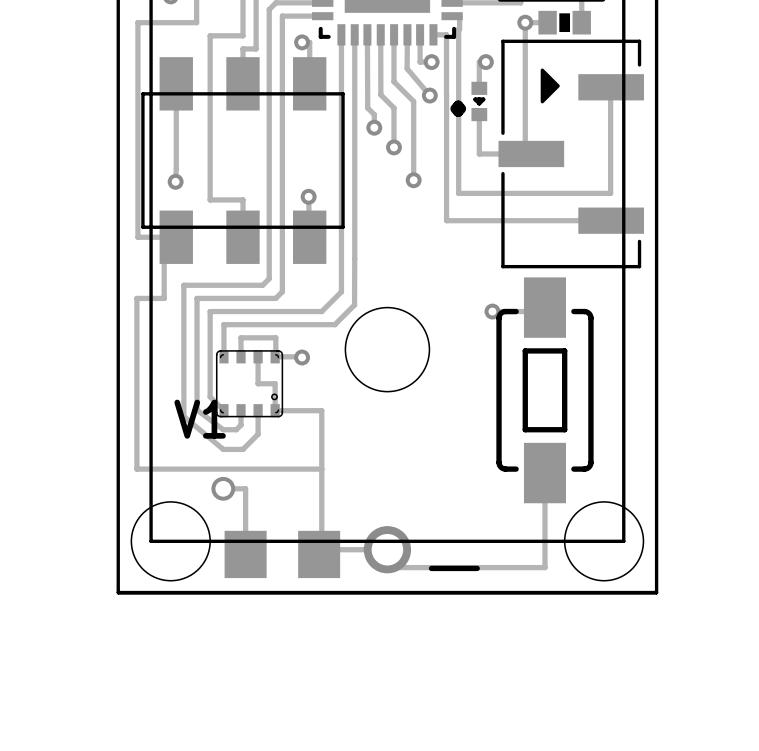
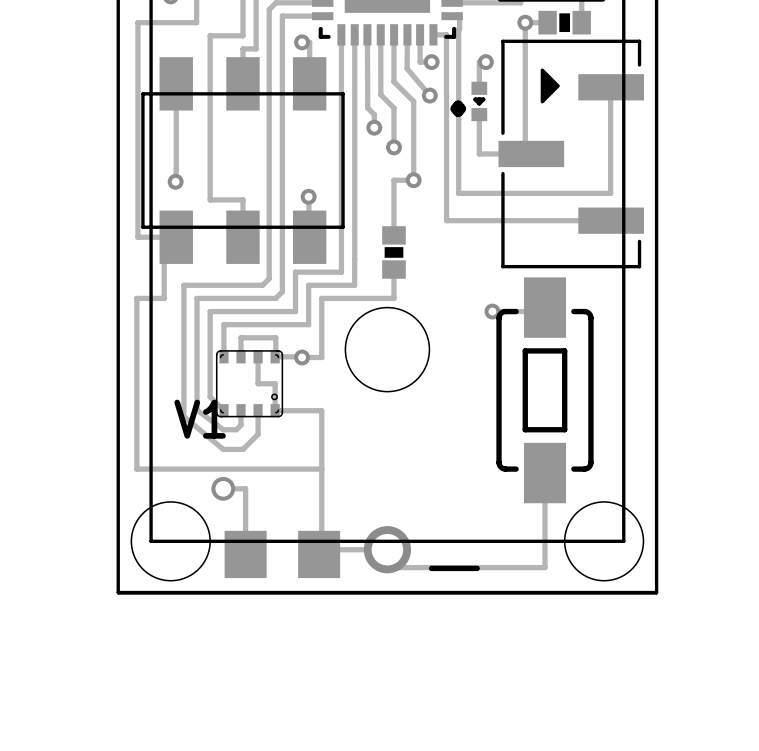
track: none -> (413, 180) (393, 180) (393, 235)
part: none -> (393, 252)
track: (354, 259) (354, 304) (334, 324) (308, 324) -> (354, 259) (354, 285) (308, 285) (308, 324)
track: none -> (393, 269) (393, 298) (321, 298) (321, 357) (302, 357)
track: (341, 272) (341, 291) (321, 311) (295, 311) -> (341, 272) (295, 272) (295, 311)

